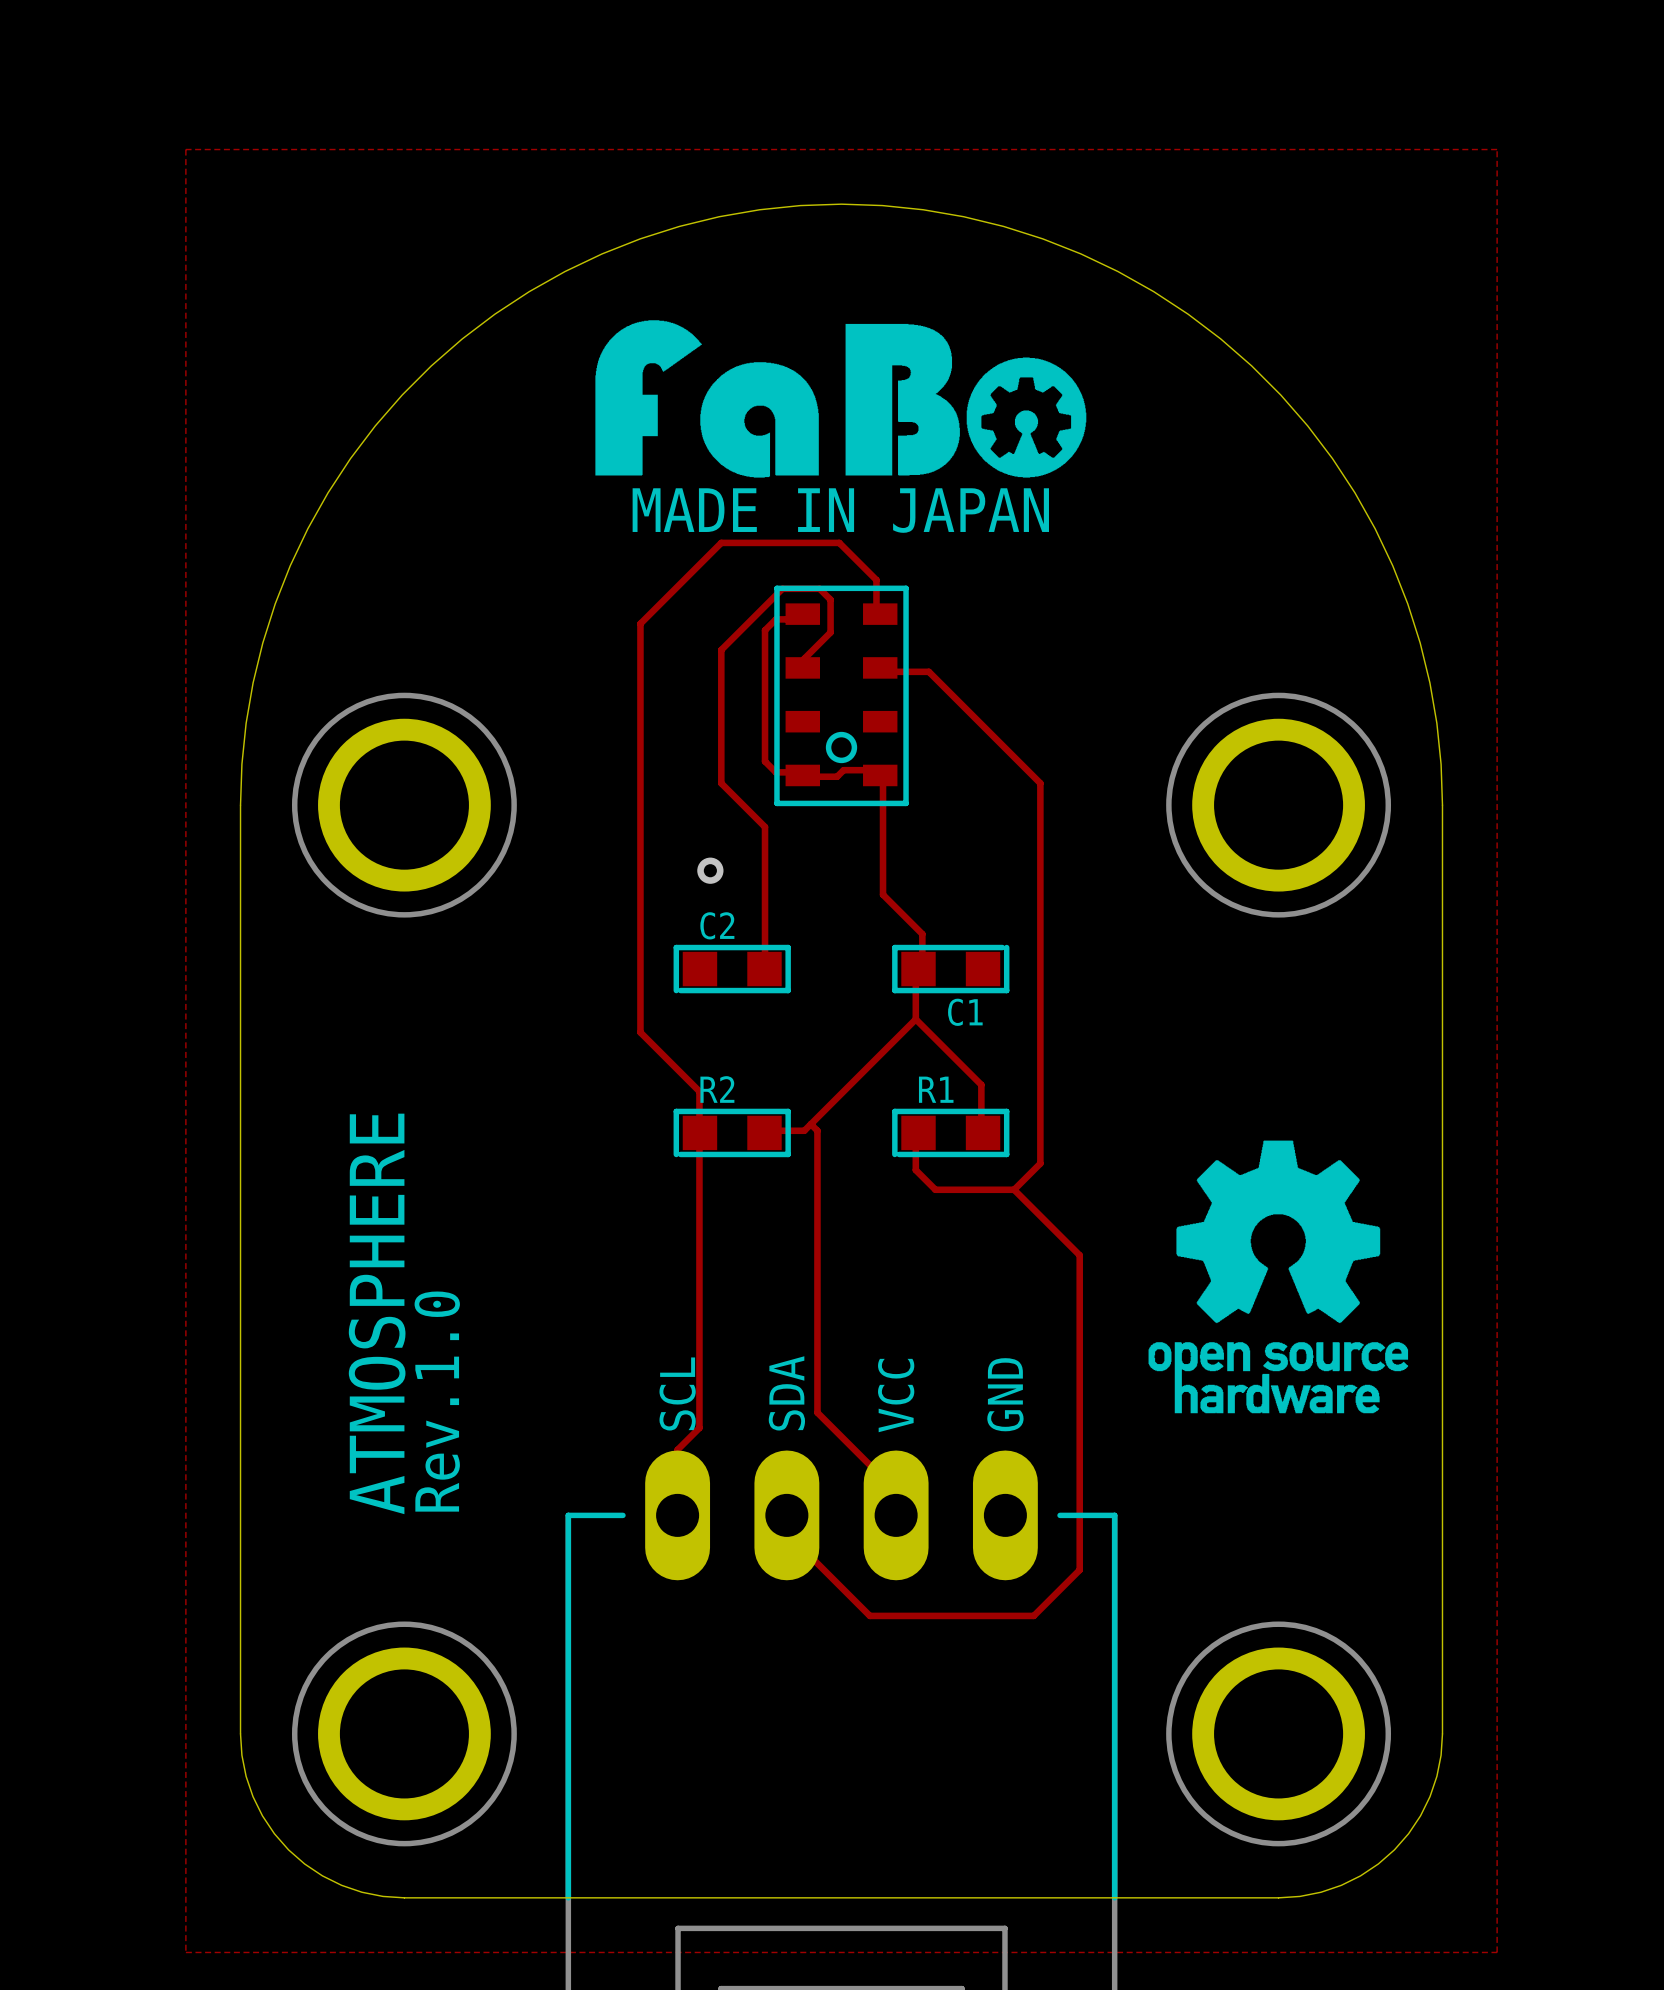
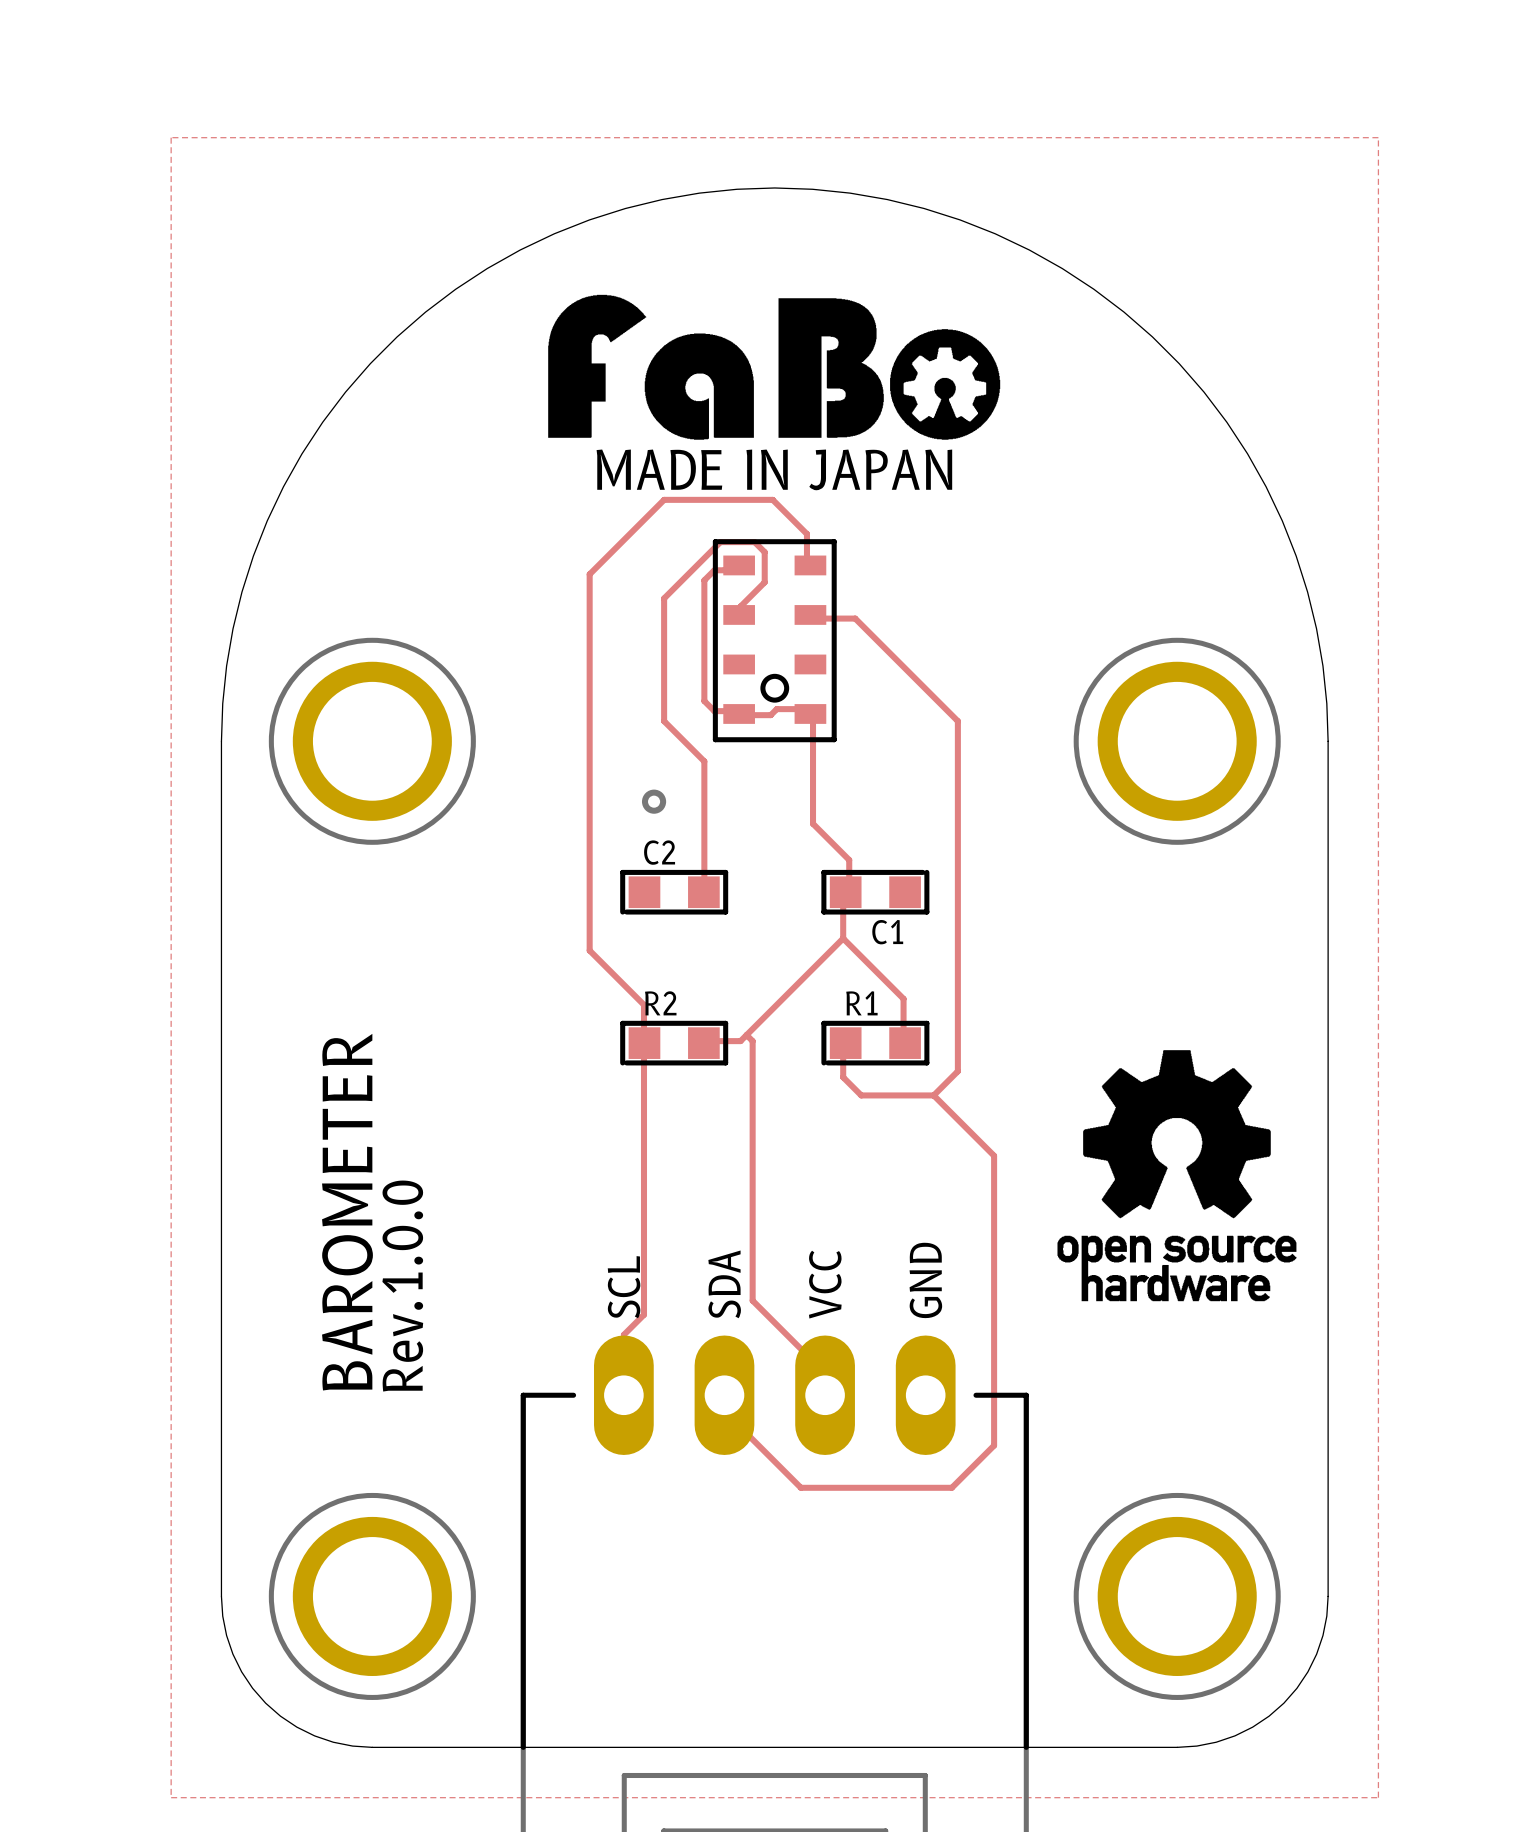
text: ATMOSPHERE (377, 1313) -> BAROMETER (347, 1212)
text: Rev.1.0 (437, 1401) -> Rev.1.0.0 (402, 1286)

